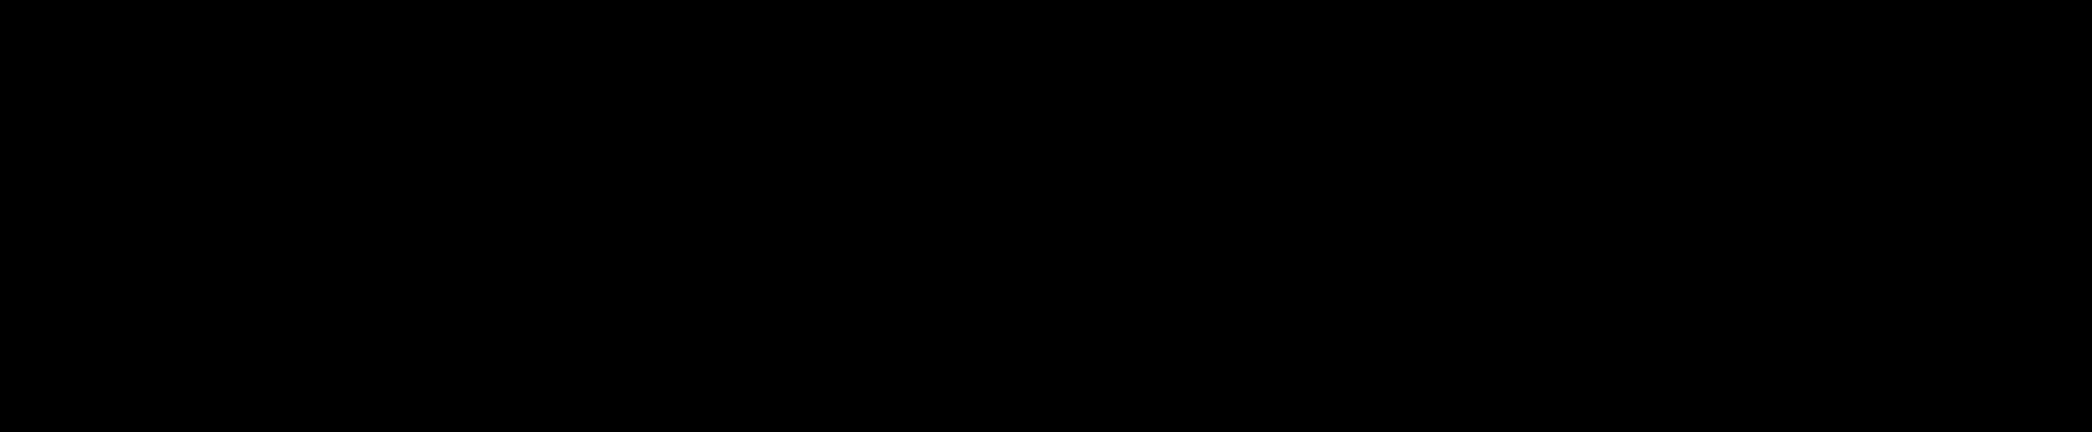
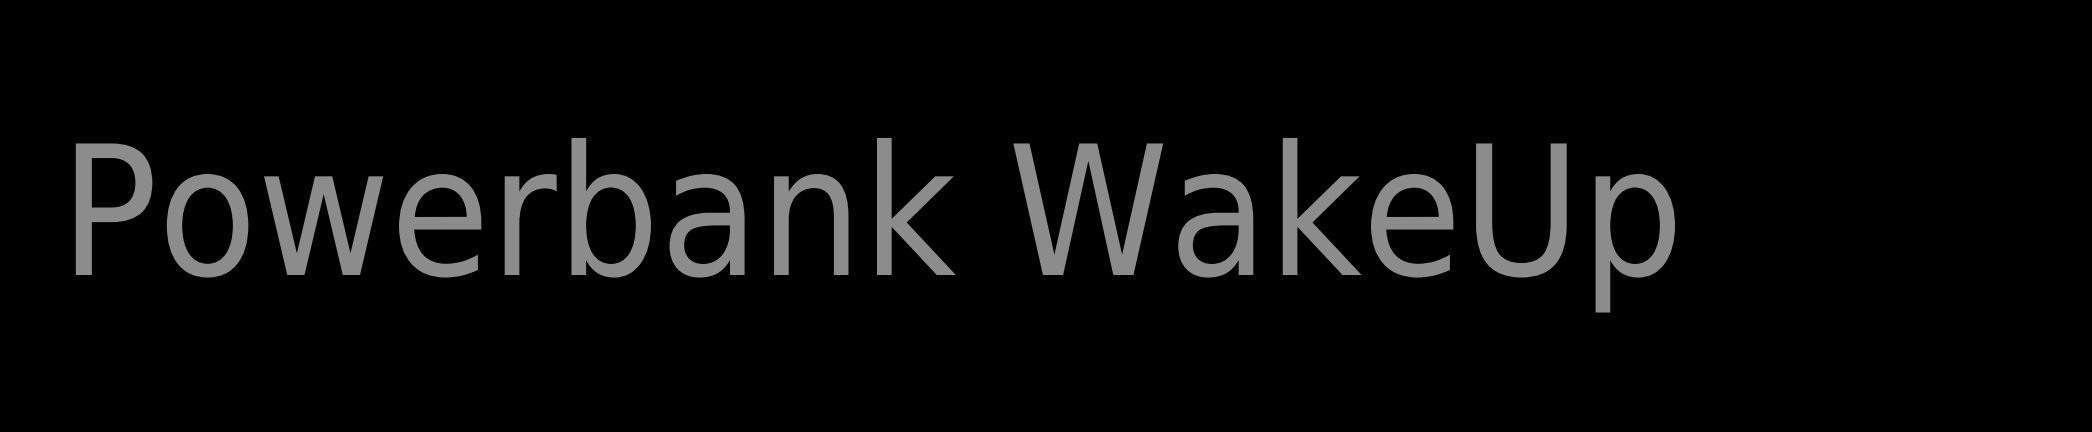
text: none -> Powerbank WakeUp (875, 225)

